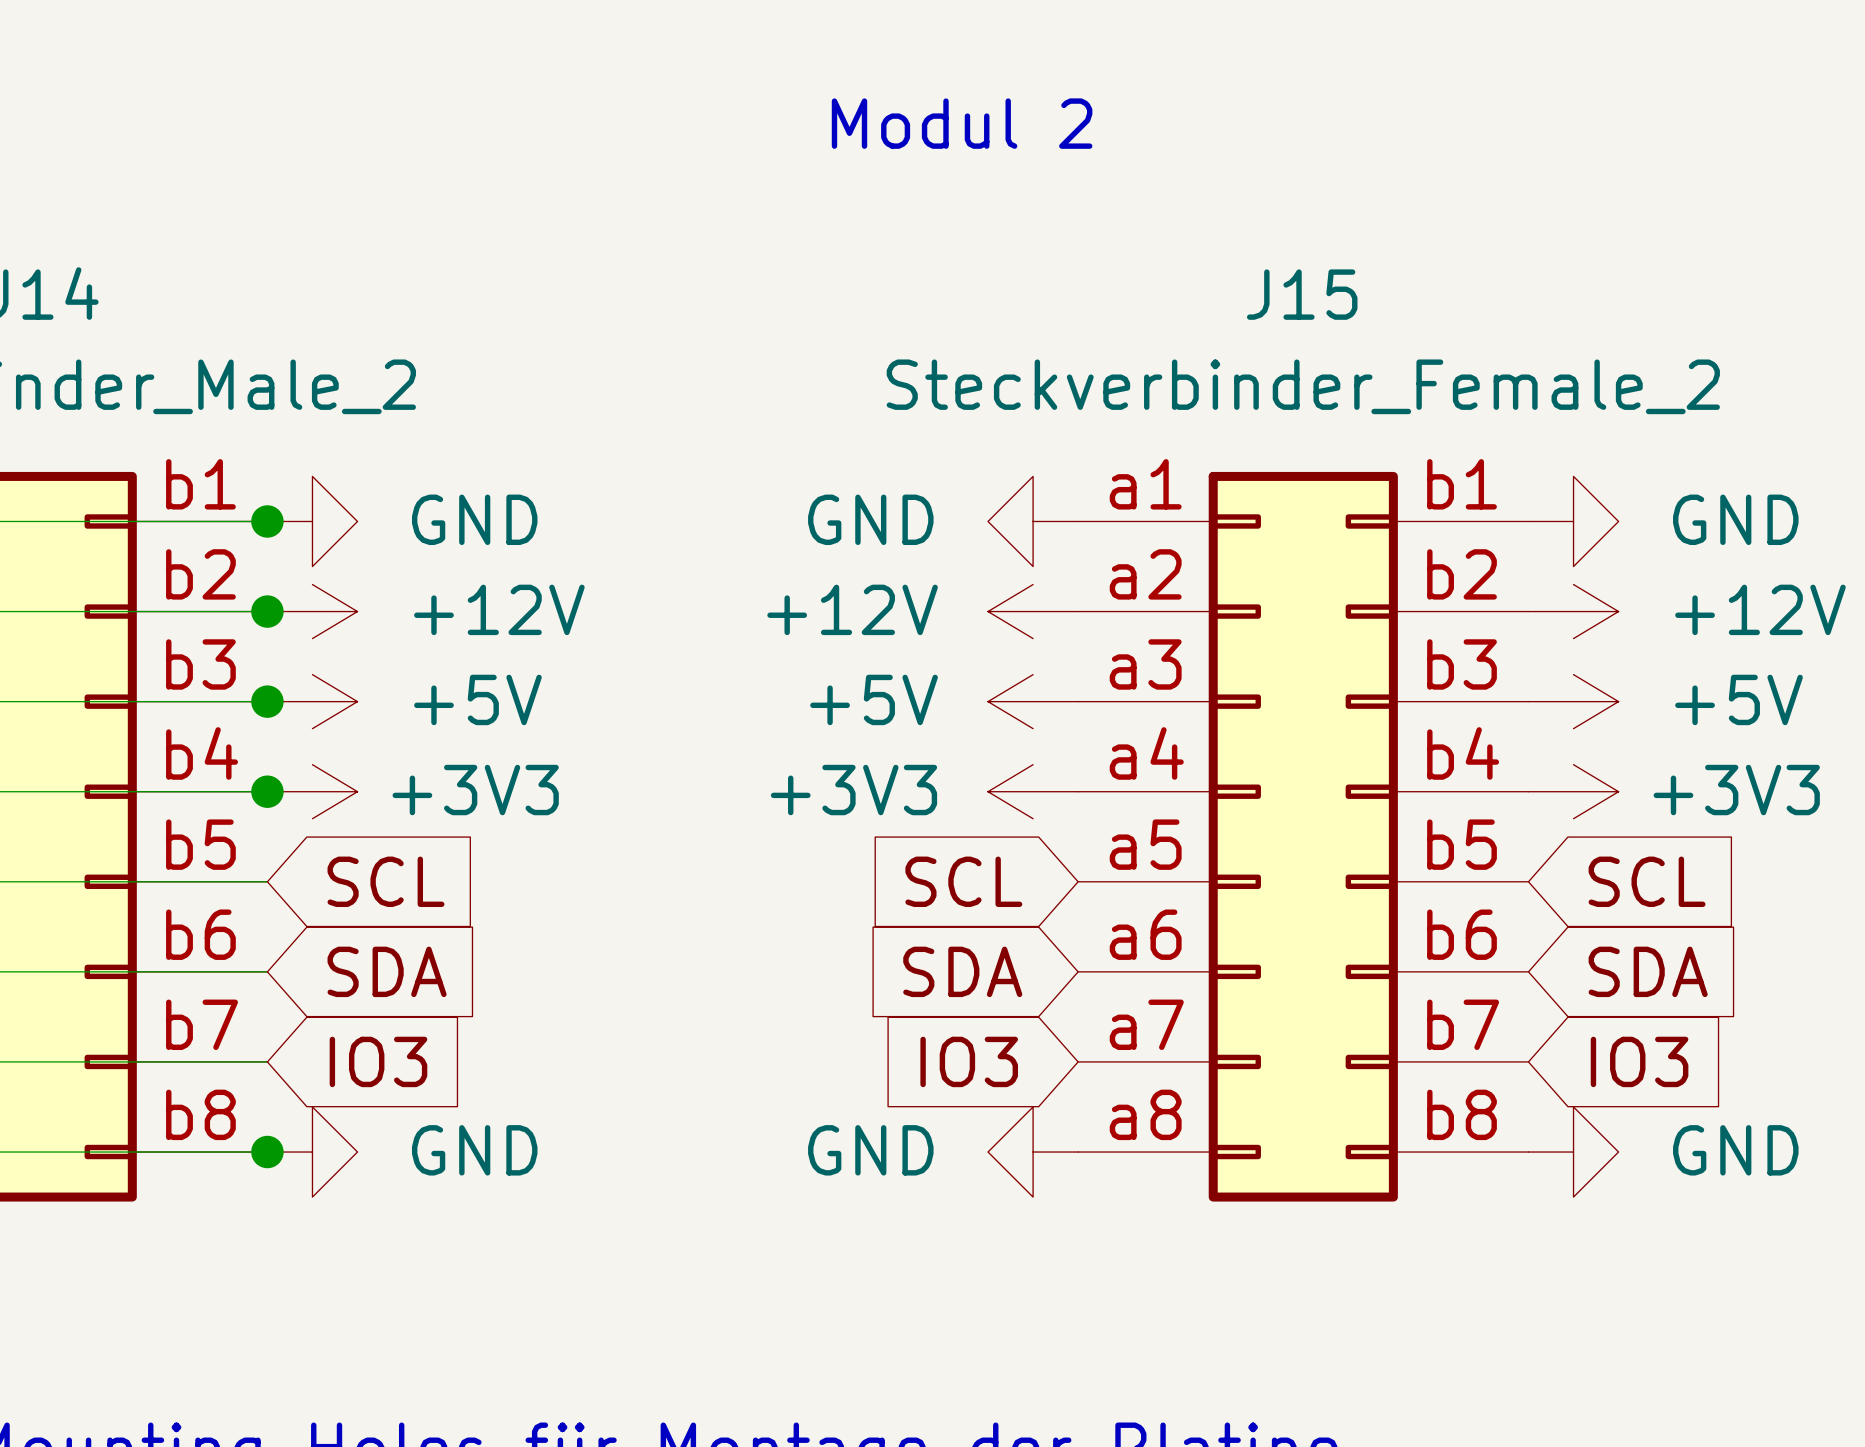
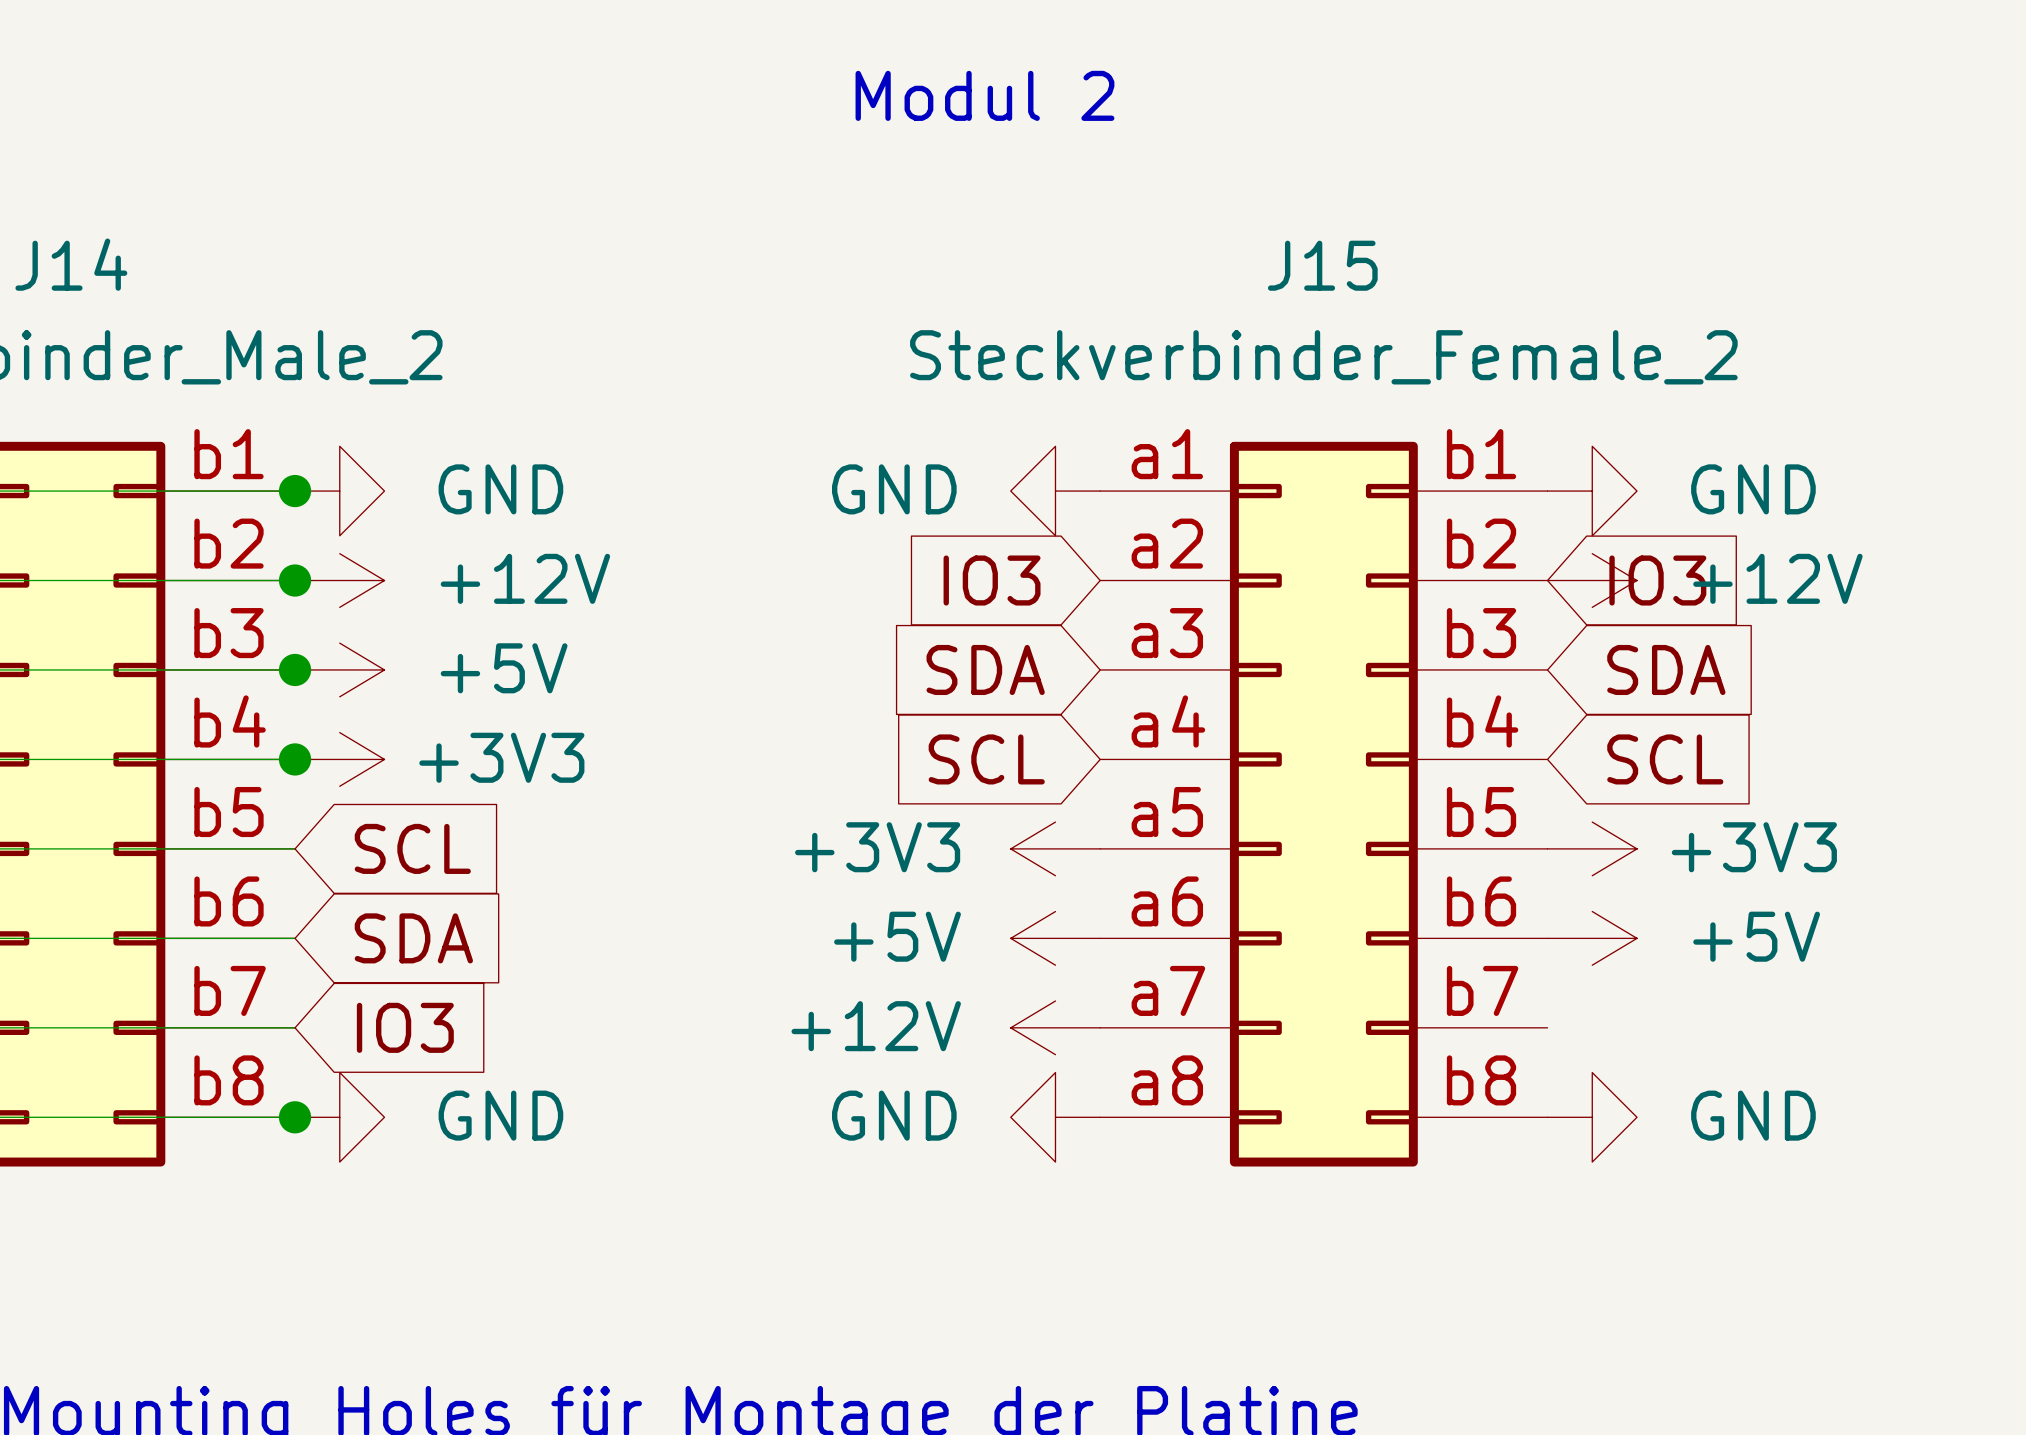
global label: none -> IO3 (992, 580)
power symbol position: +12V (1033, 611) -> +12V (1055, 1027)
global label: none -> IO3 (1657, 580)
global label: none -> SDA (985, 669)
power symbol position: +5V (1033, 701) -> +5V (1055, 938)
power symbol position: +5V (1573, 701) -> +5V (1592, 938)
global label: none -> SDA (1666, 669)
power symbol position: +3V3 (1033, 791) -> +3V3 (1055, 848)
power symbol position: +3V3 (1573, 791) -> +3V3 (1592, 848)
global label position: SCL (963, 881) -> SCL (986, 759)
global label position: SCL (1647, 881) -> SCL (1665, 759)
global label: SDA (962, 971) -> none
global label: SDA (1648, 971) -> none
global label: IO3 (969, 1061) -> none
global label: IO3 (1639, 1061) -> none

